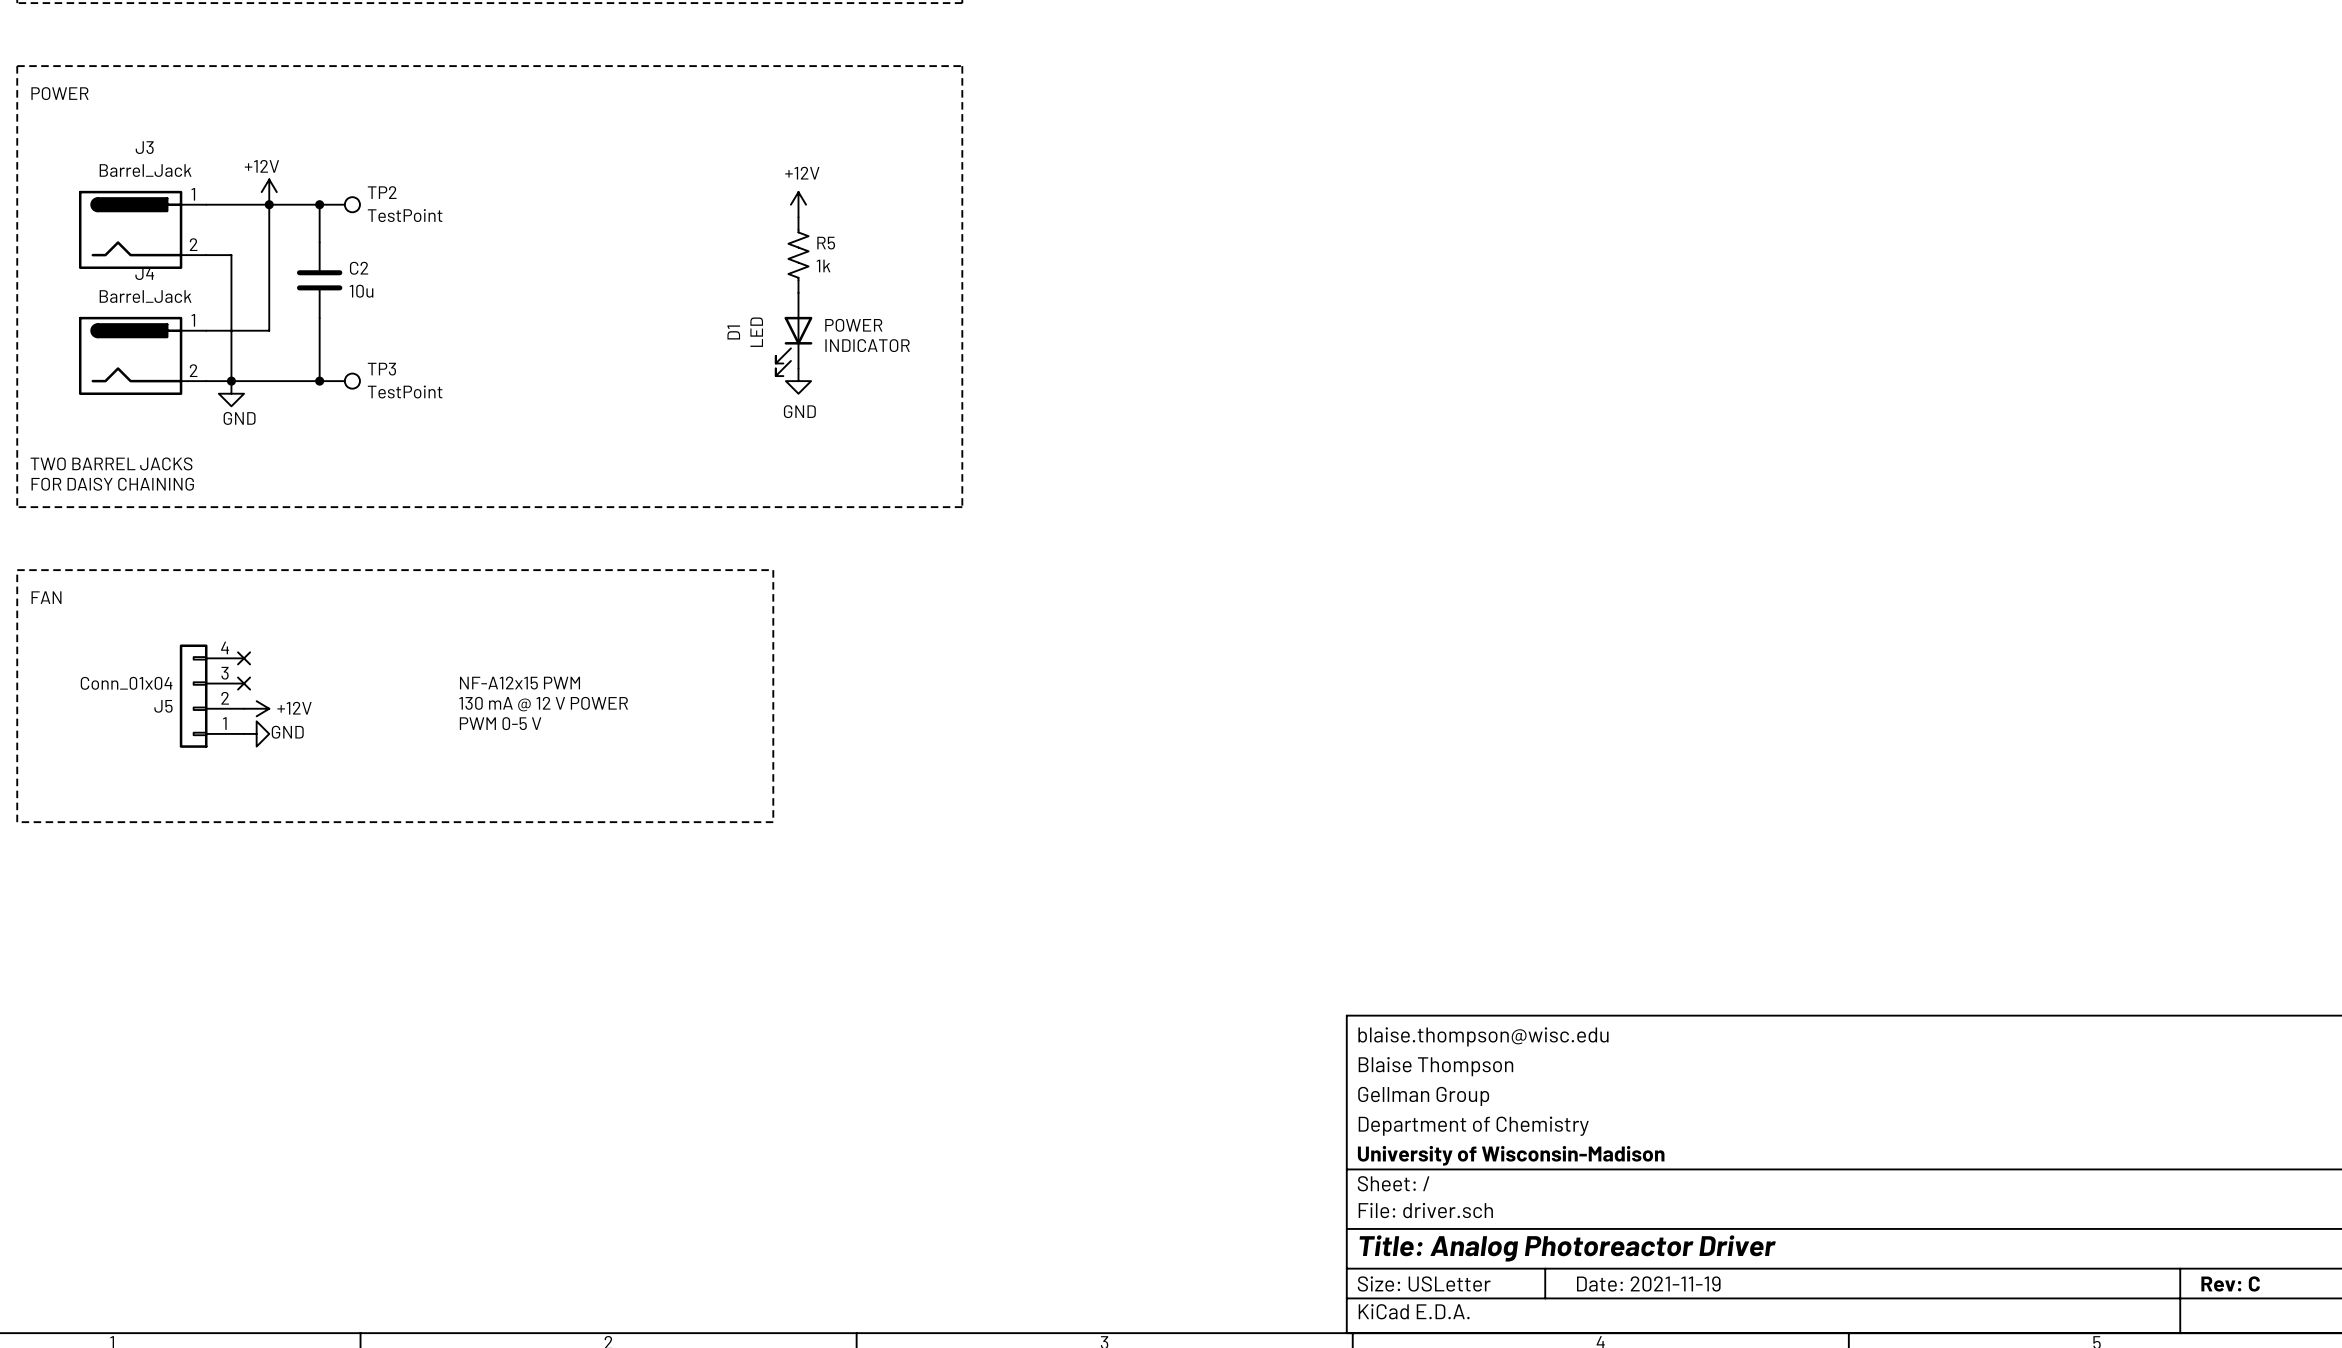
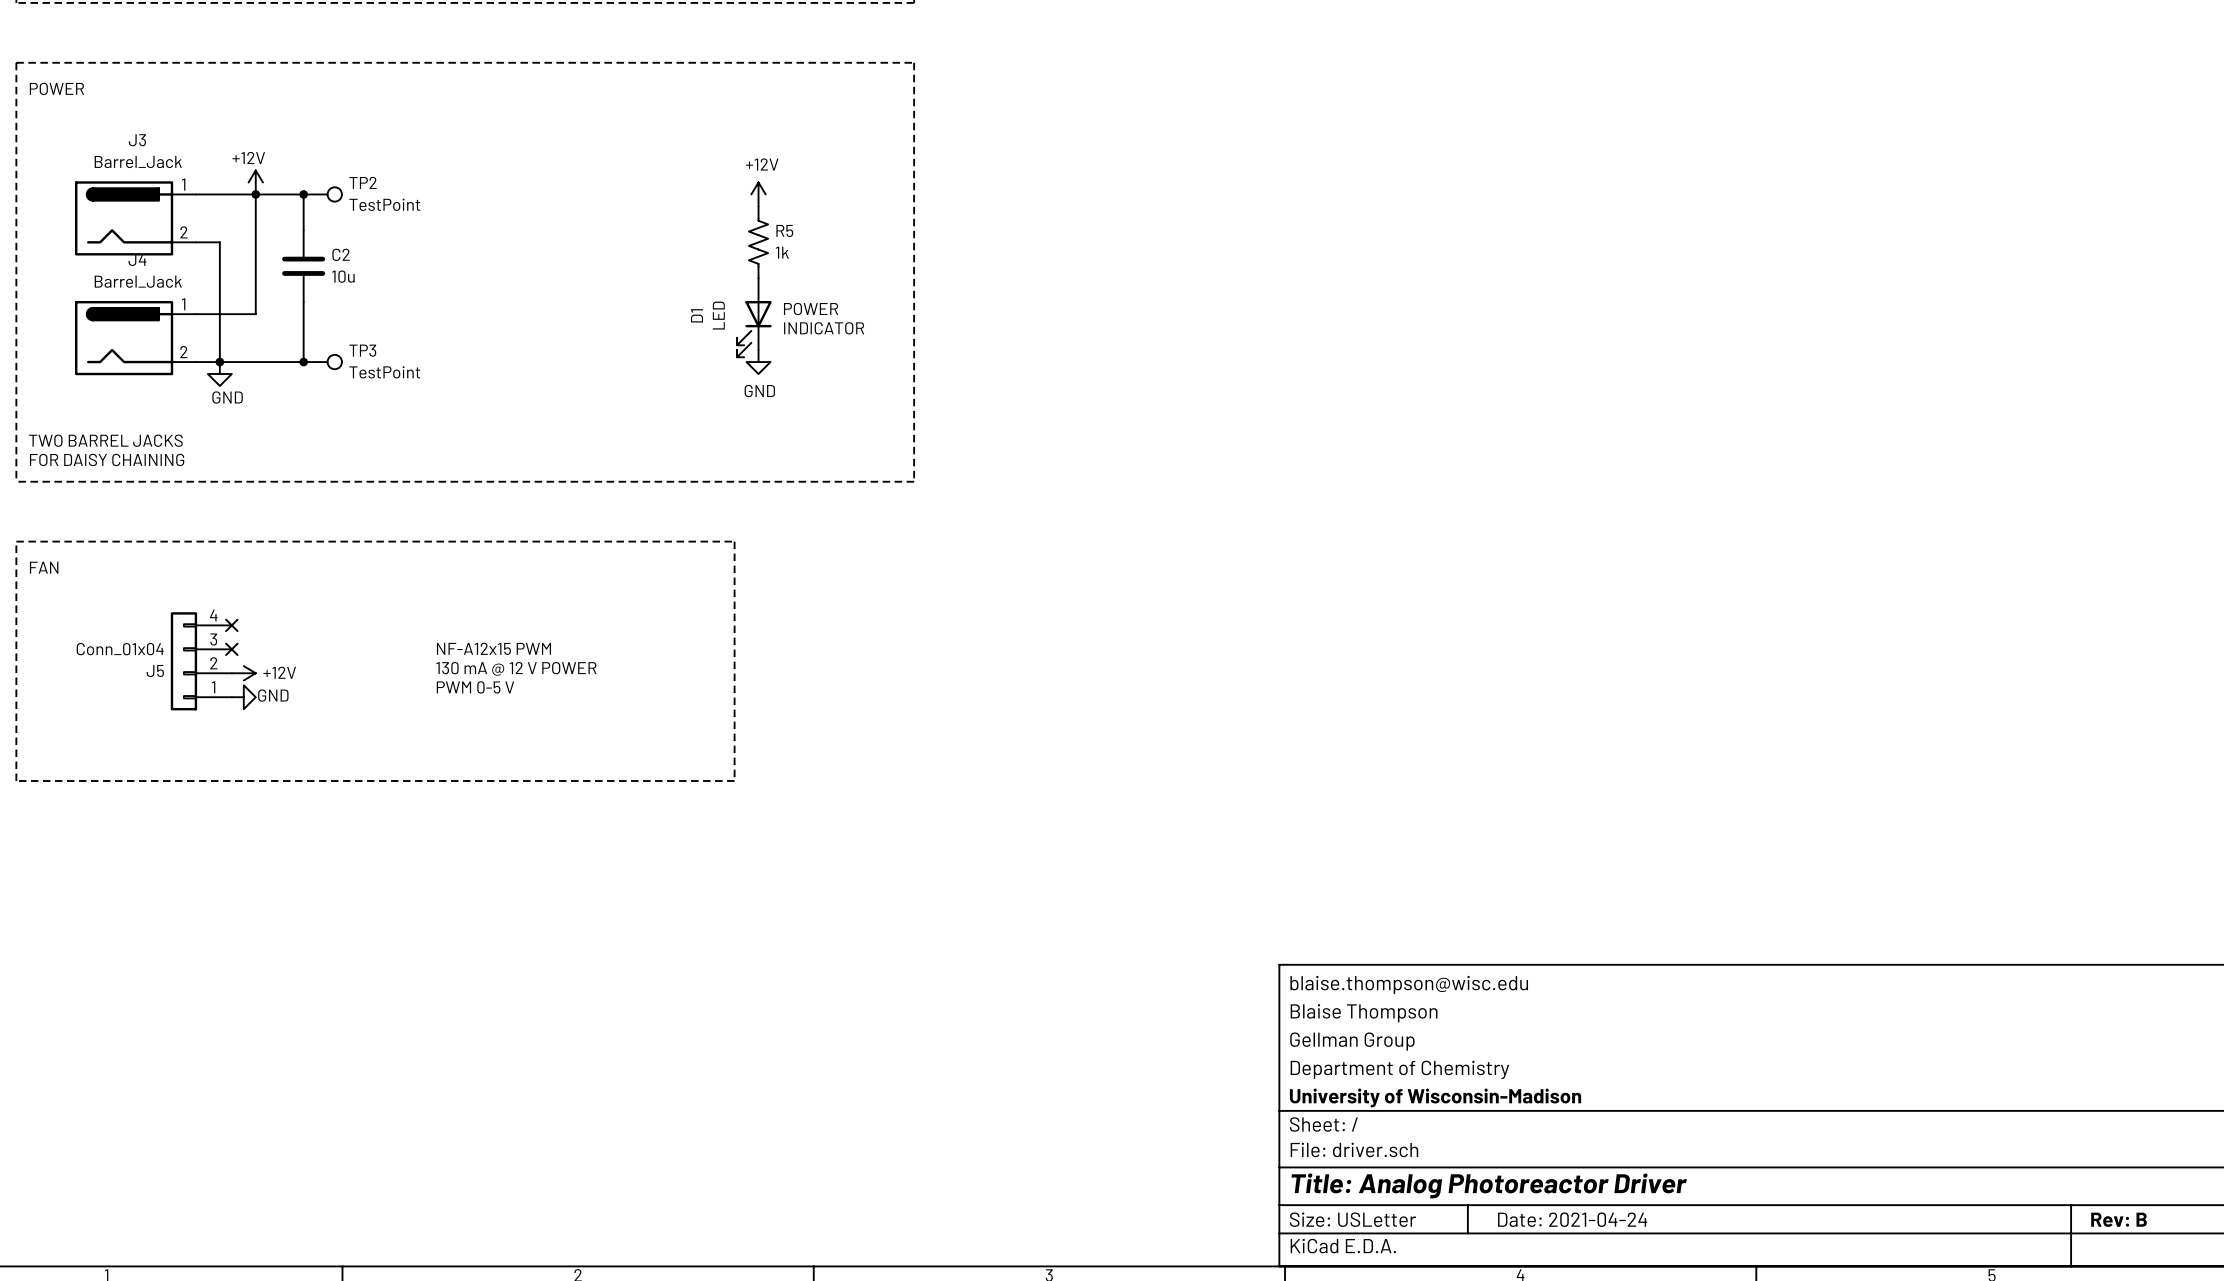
title block: Date: 2021-11-19 (1648, 1283) -> Date: 2021-04-24 (1572, 1219)
title block: Rev: C (2230, 1283) -> Rev: B (2119, 1219)

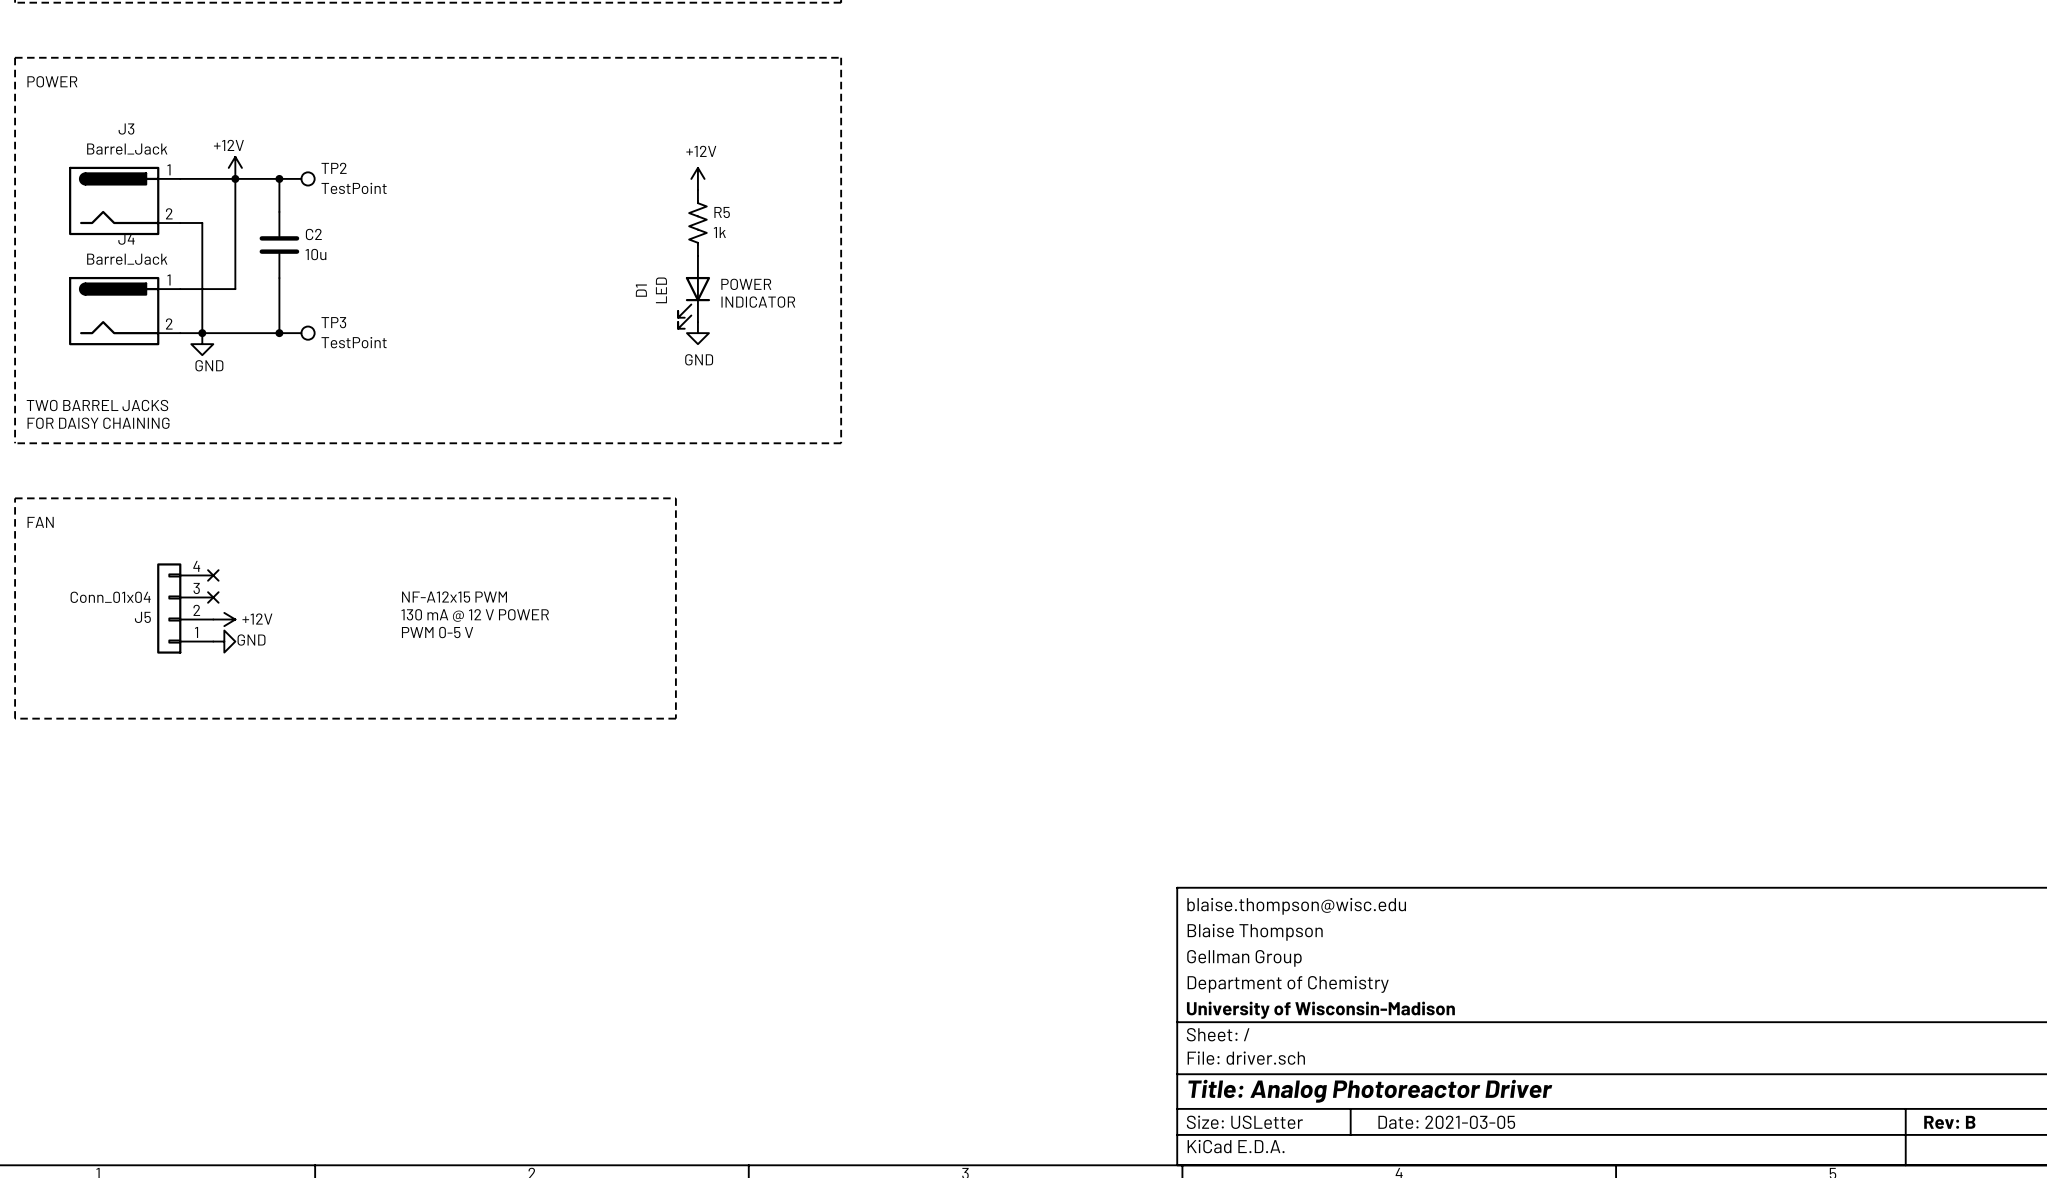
title block: Date: 2021-04-24 (1572, 1219) -> Date: 2021-03-05 (1446, 1122)

